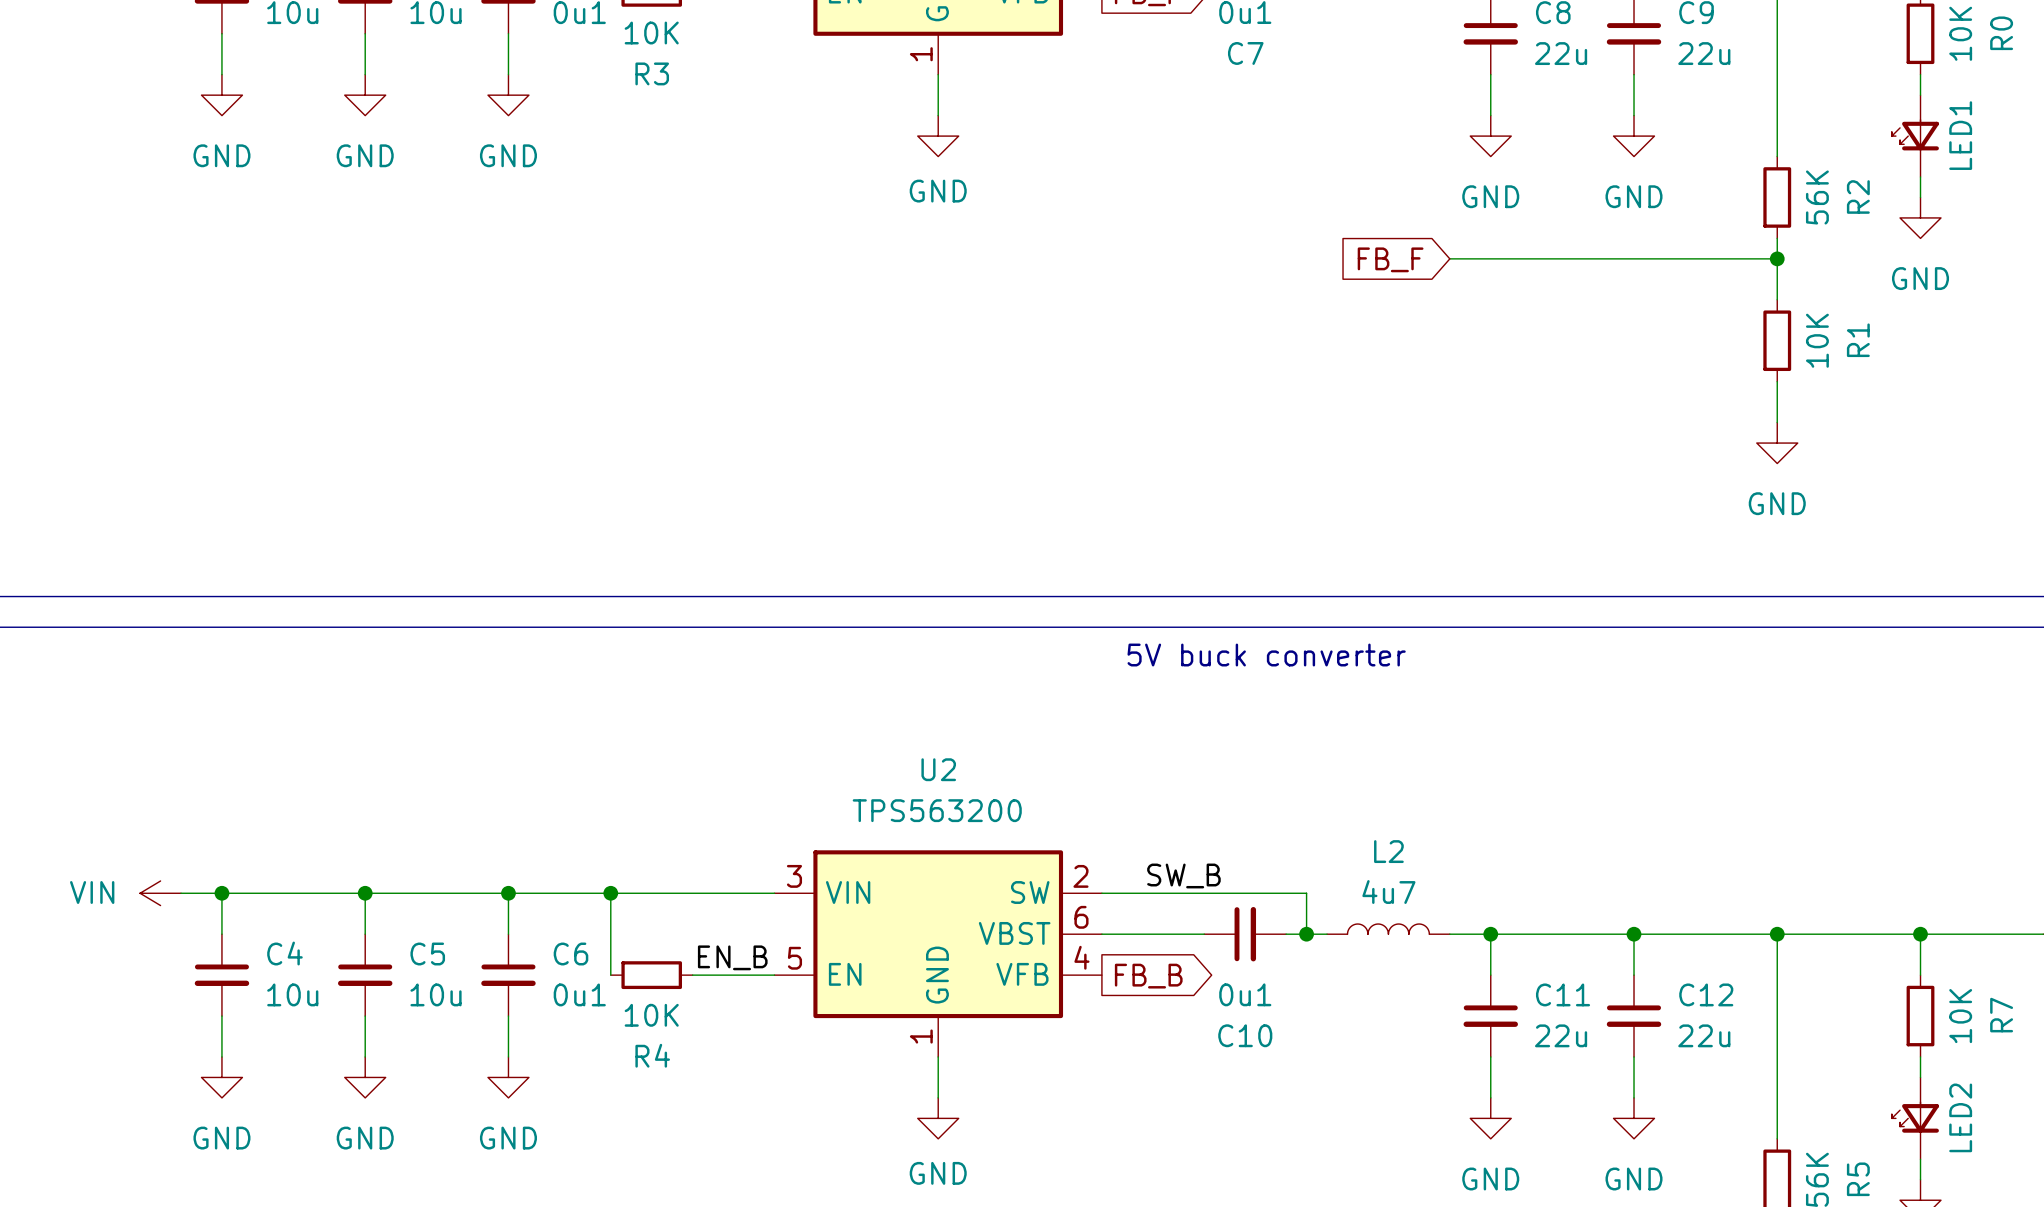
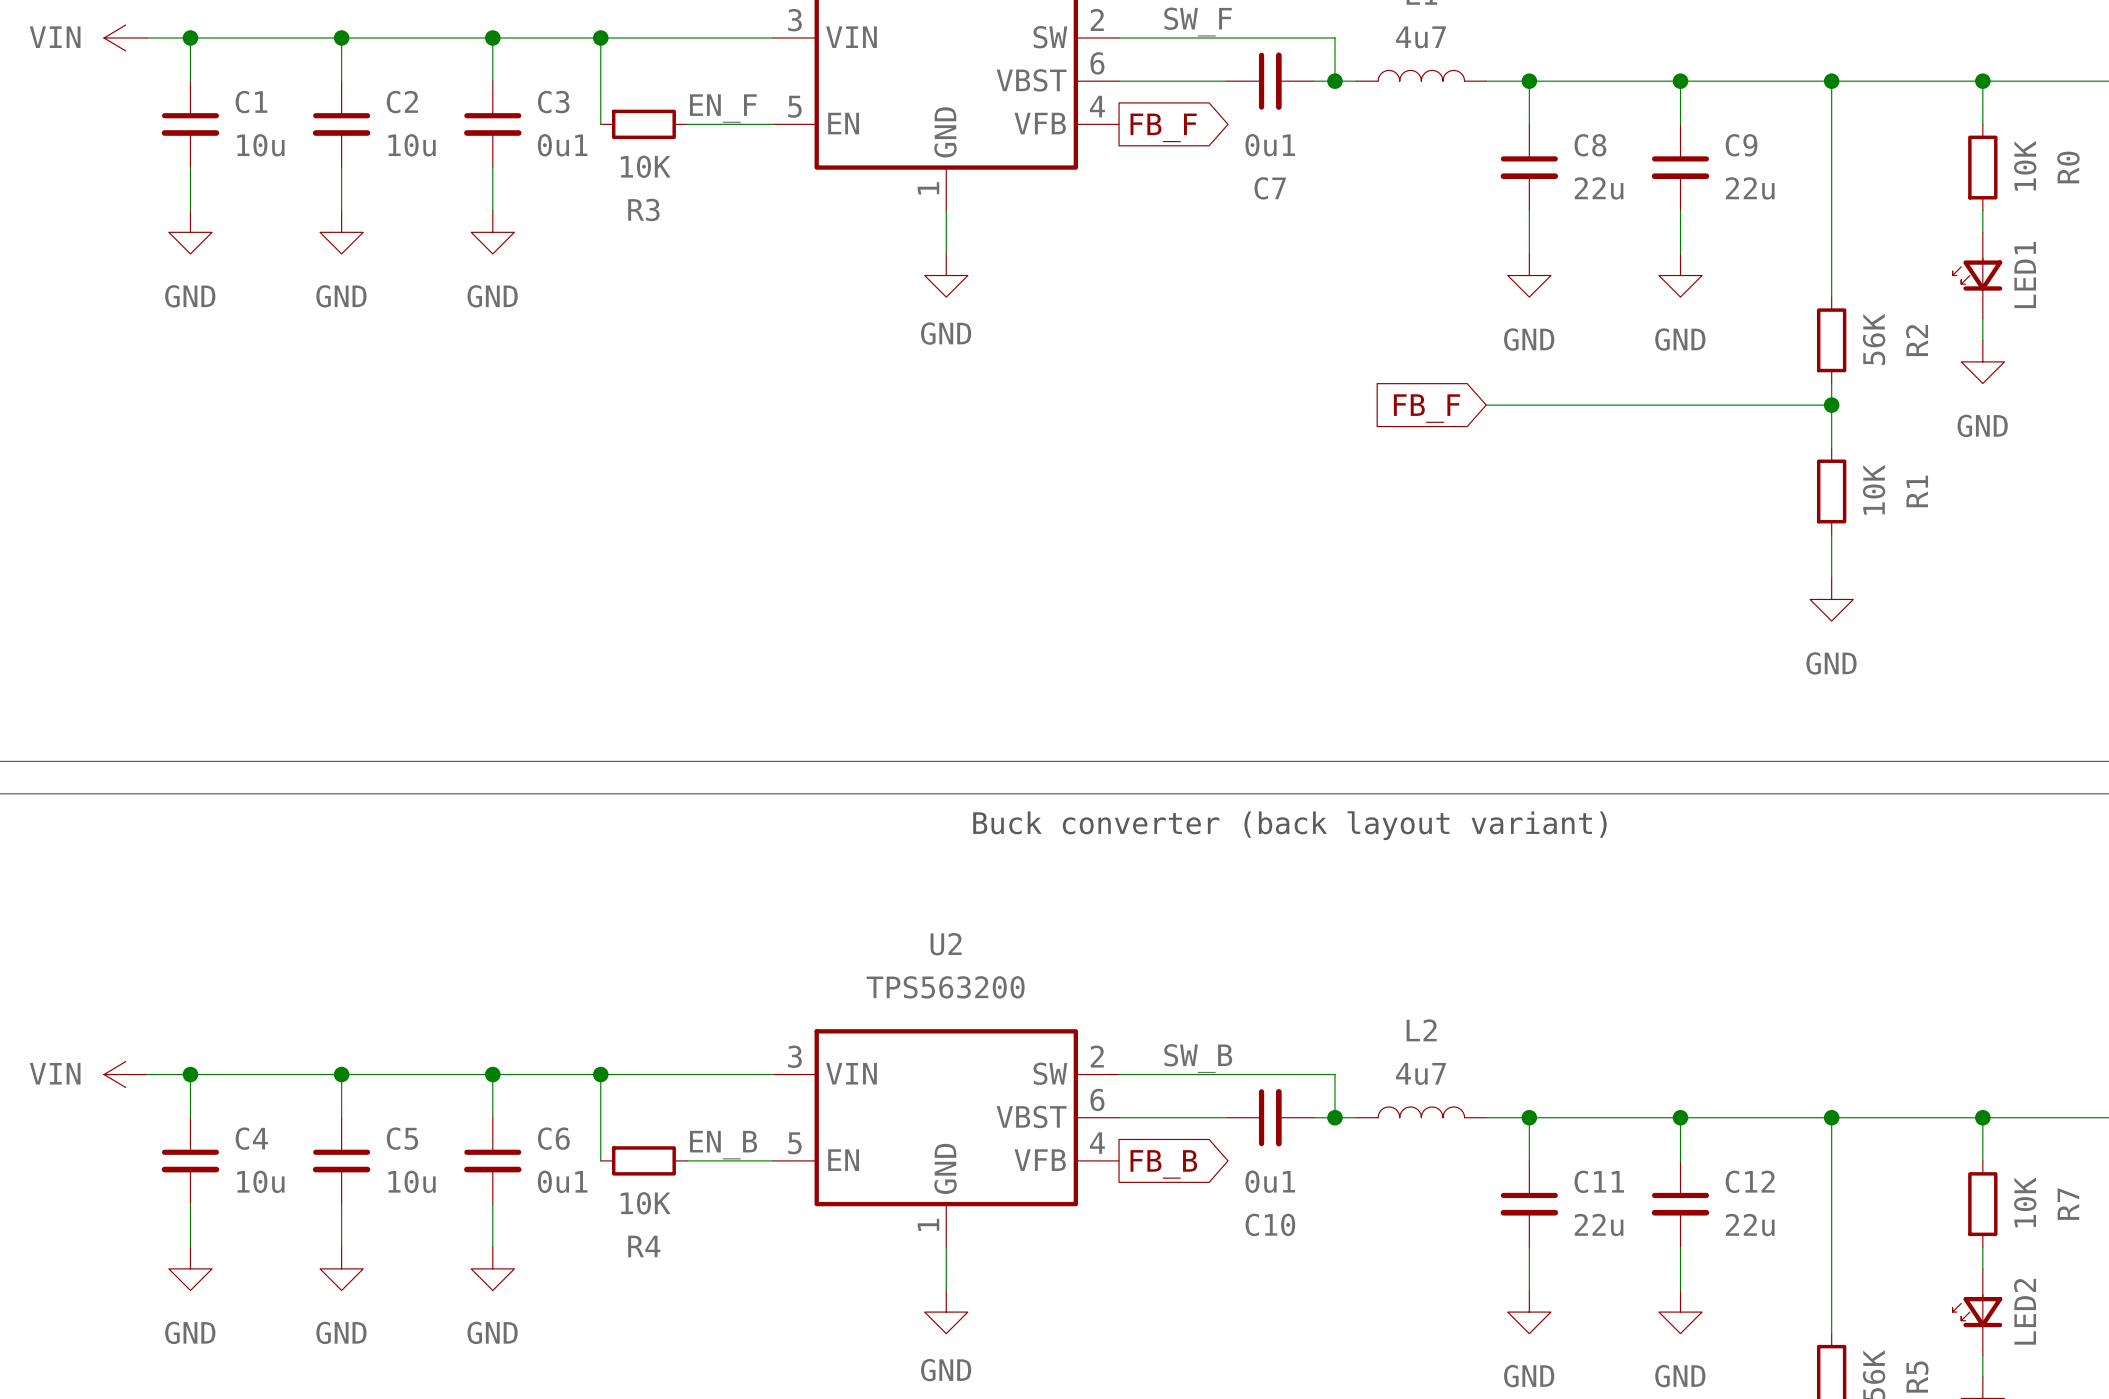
text: 5V buck converter (1266, 655) -> Buck converter (back layout variant) (1289, 825)

